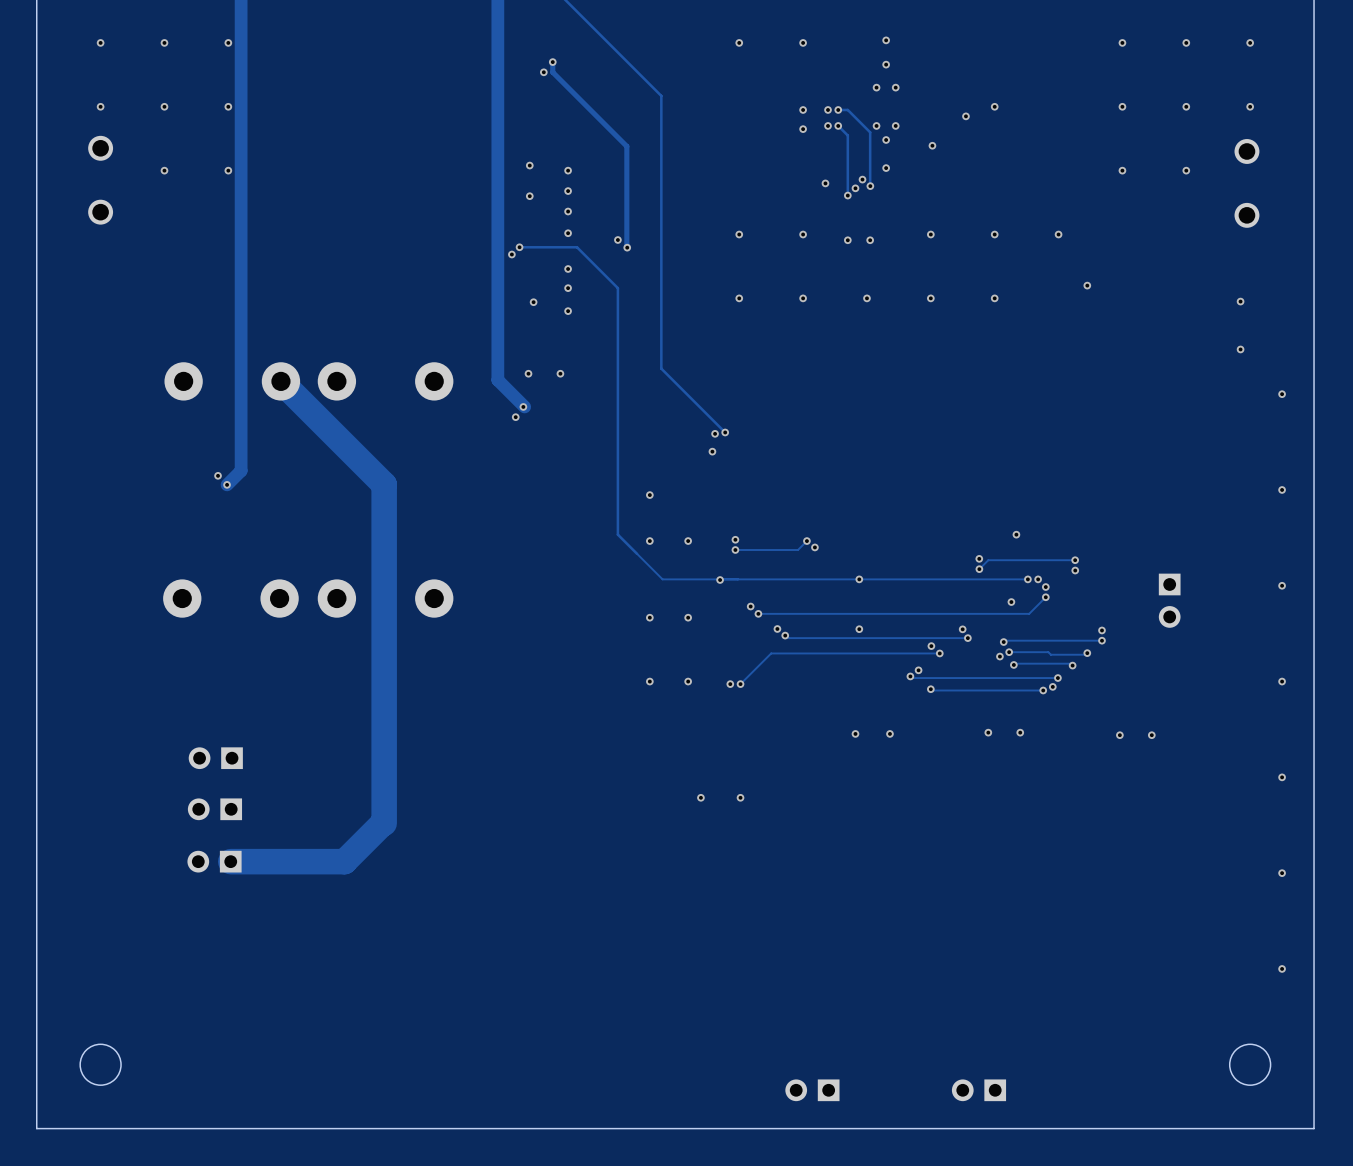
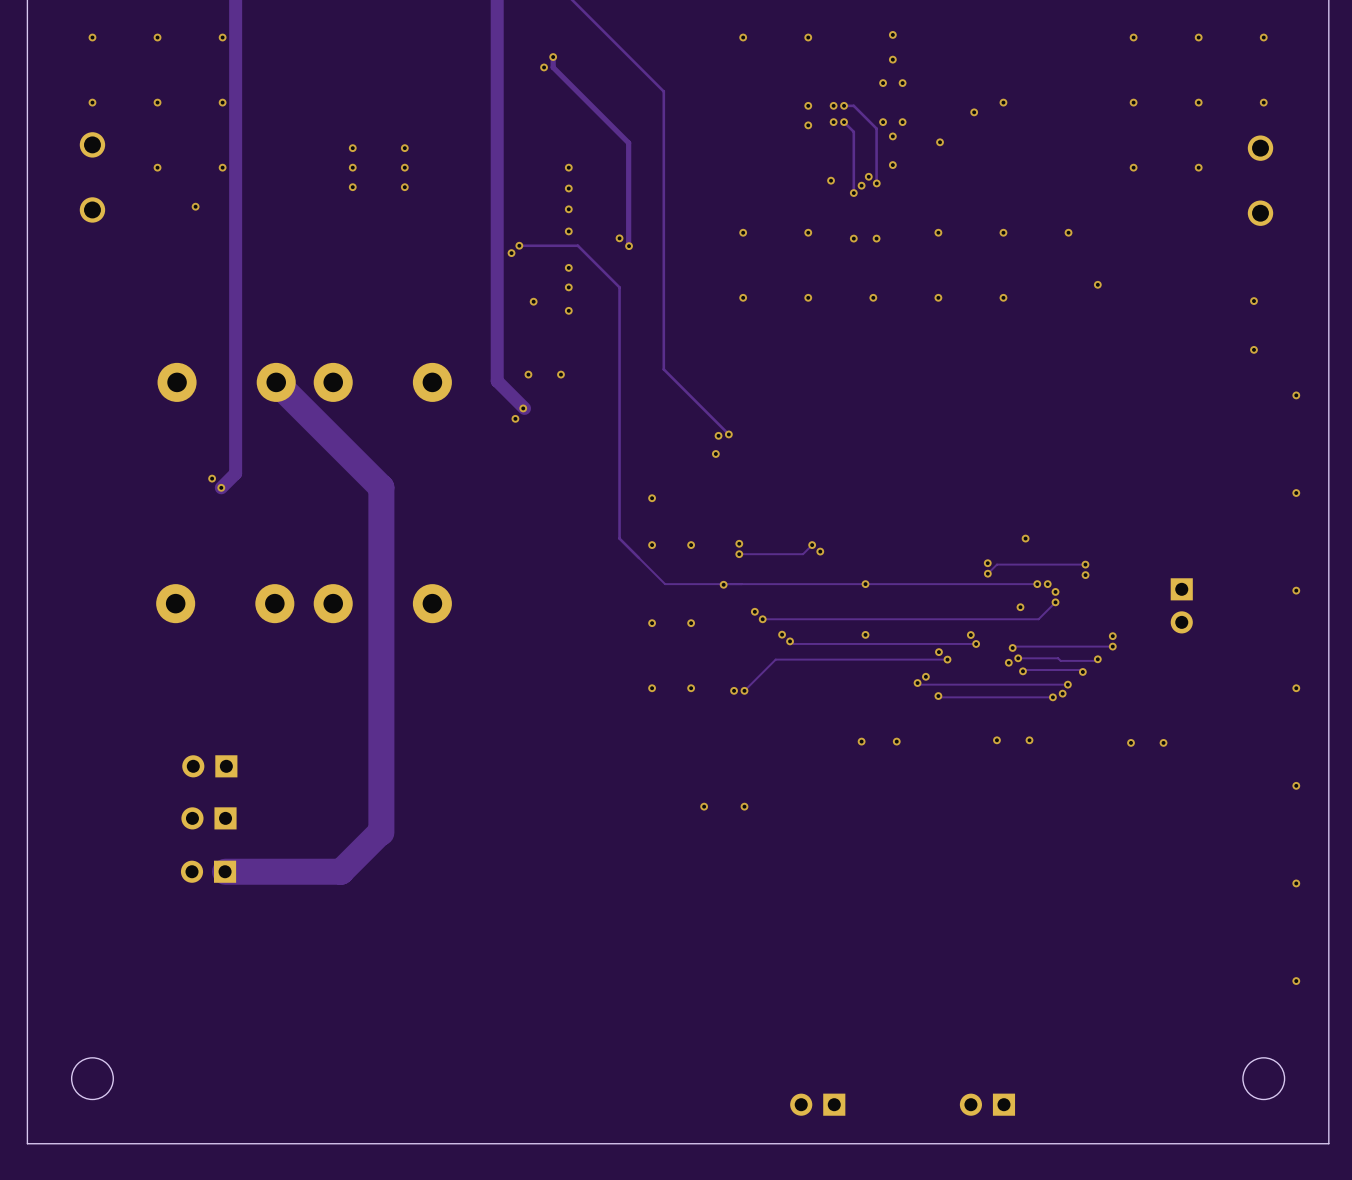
via: none -> (352, 148)
via: none -> (404, 148)
via: (529, 165) -> none
via: none -> (352, 167)
via: none -> (404, 167)
via: none -> (352, 187)
via: none -> (404, 187)
via: (529, 196) -> none
via: none -> (195, 206)

